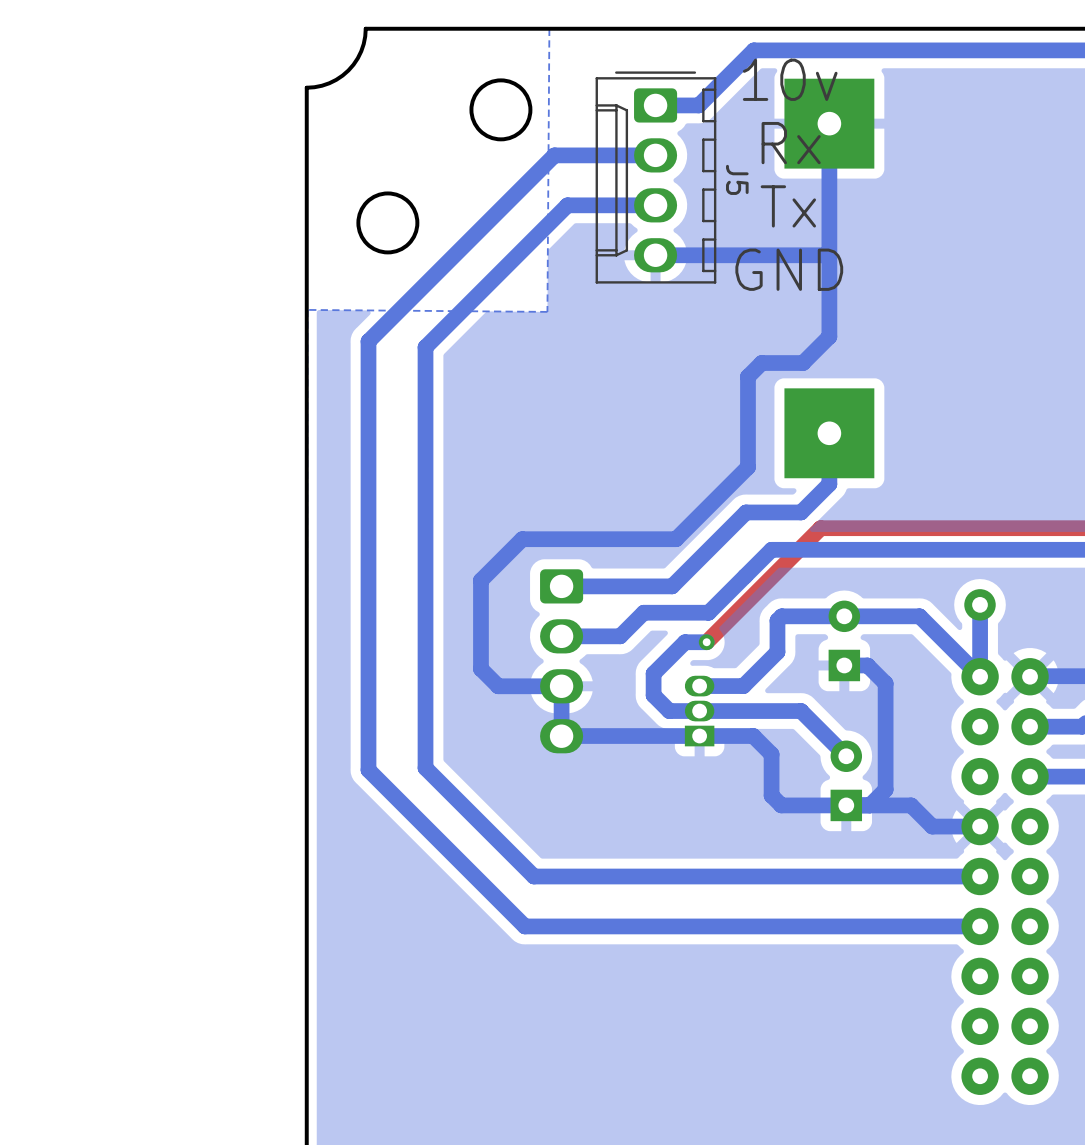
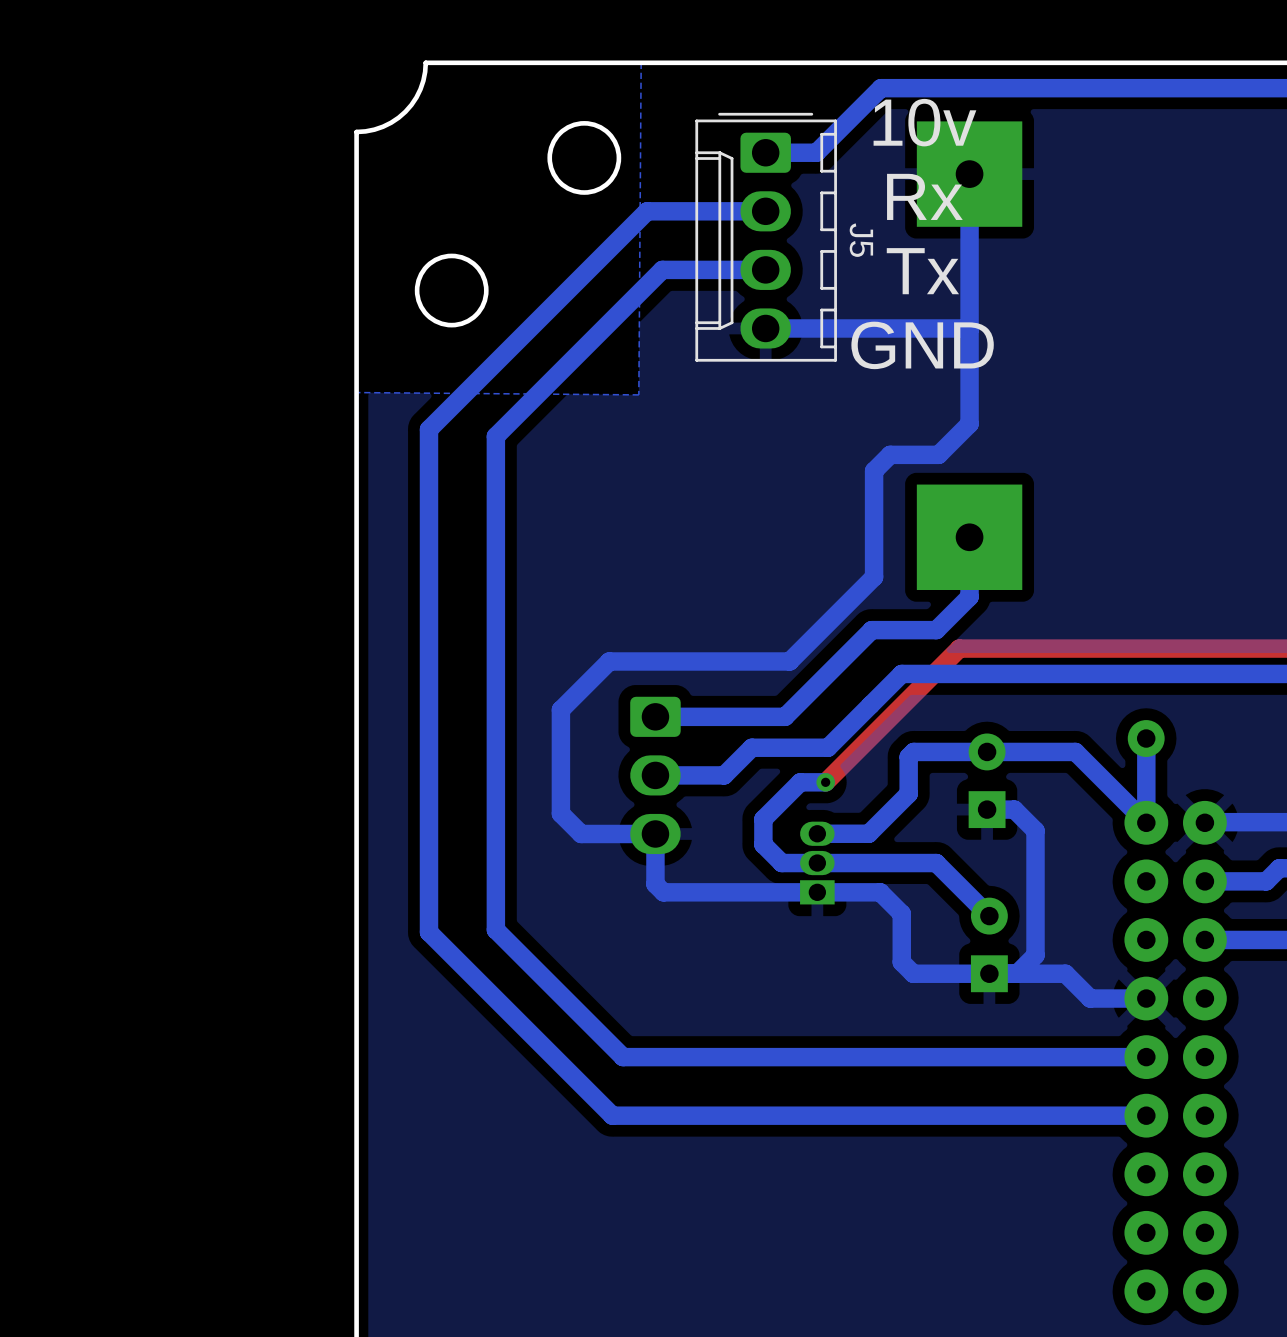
part: (561, 661) -> none

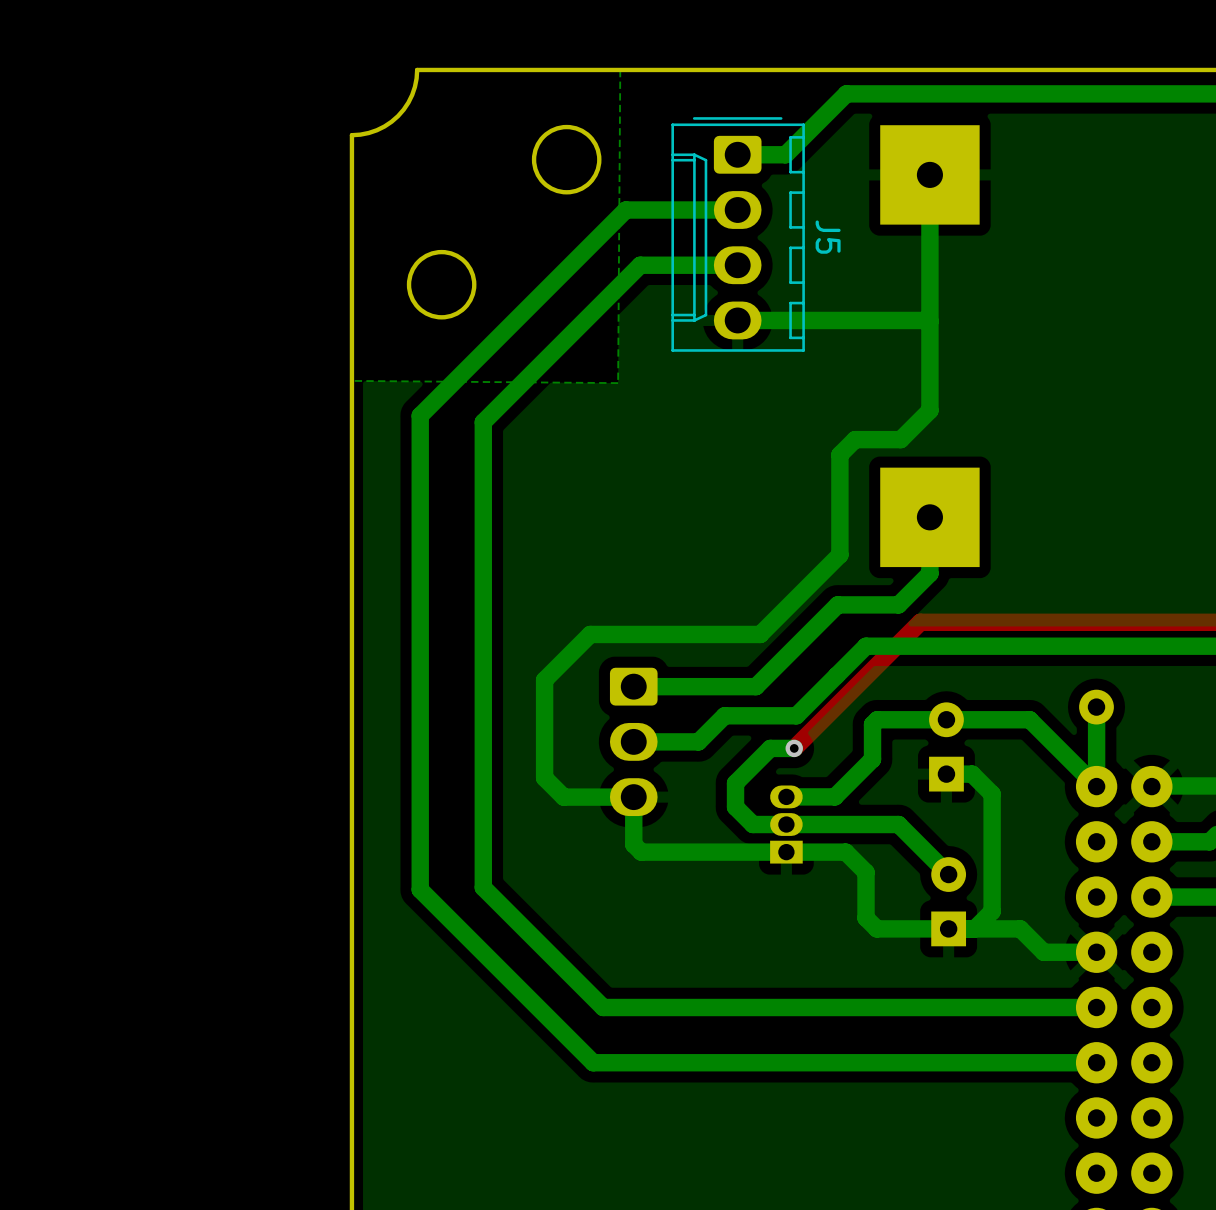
text: 10v (924, 122) -> none
text: Rx (924, 196) -> none
text: Tx (922, 271) -> none
text: GND (922, 345) -> none

